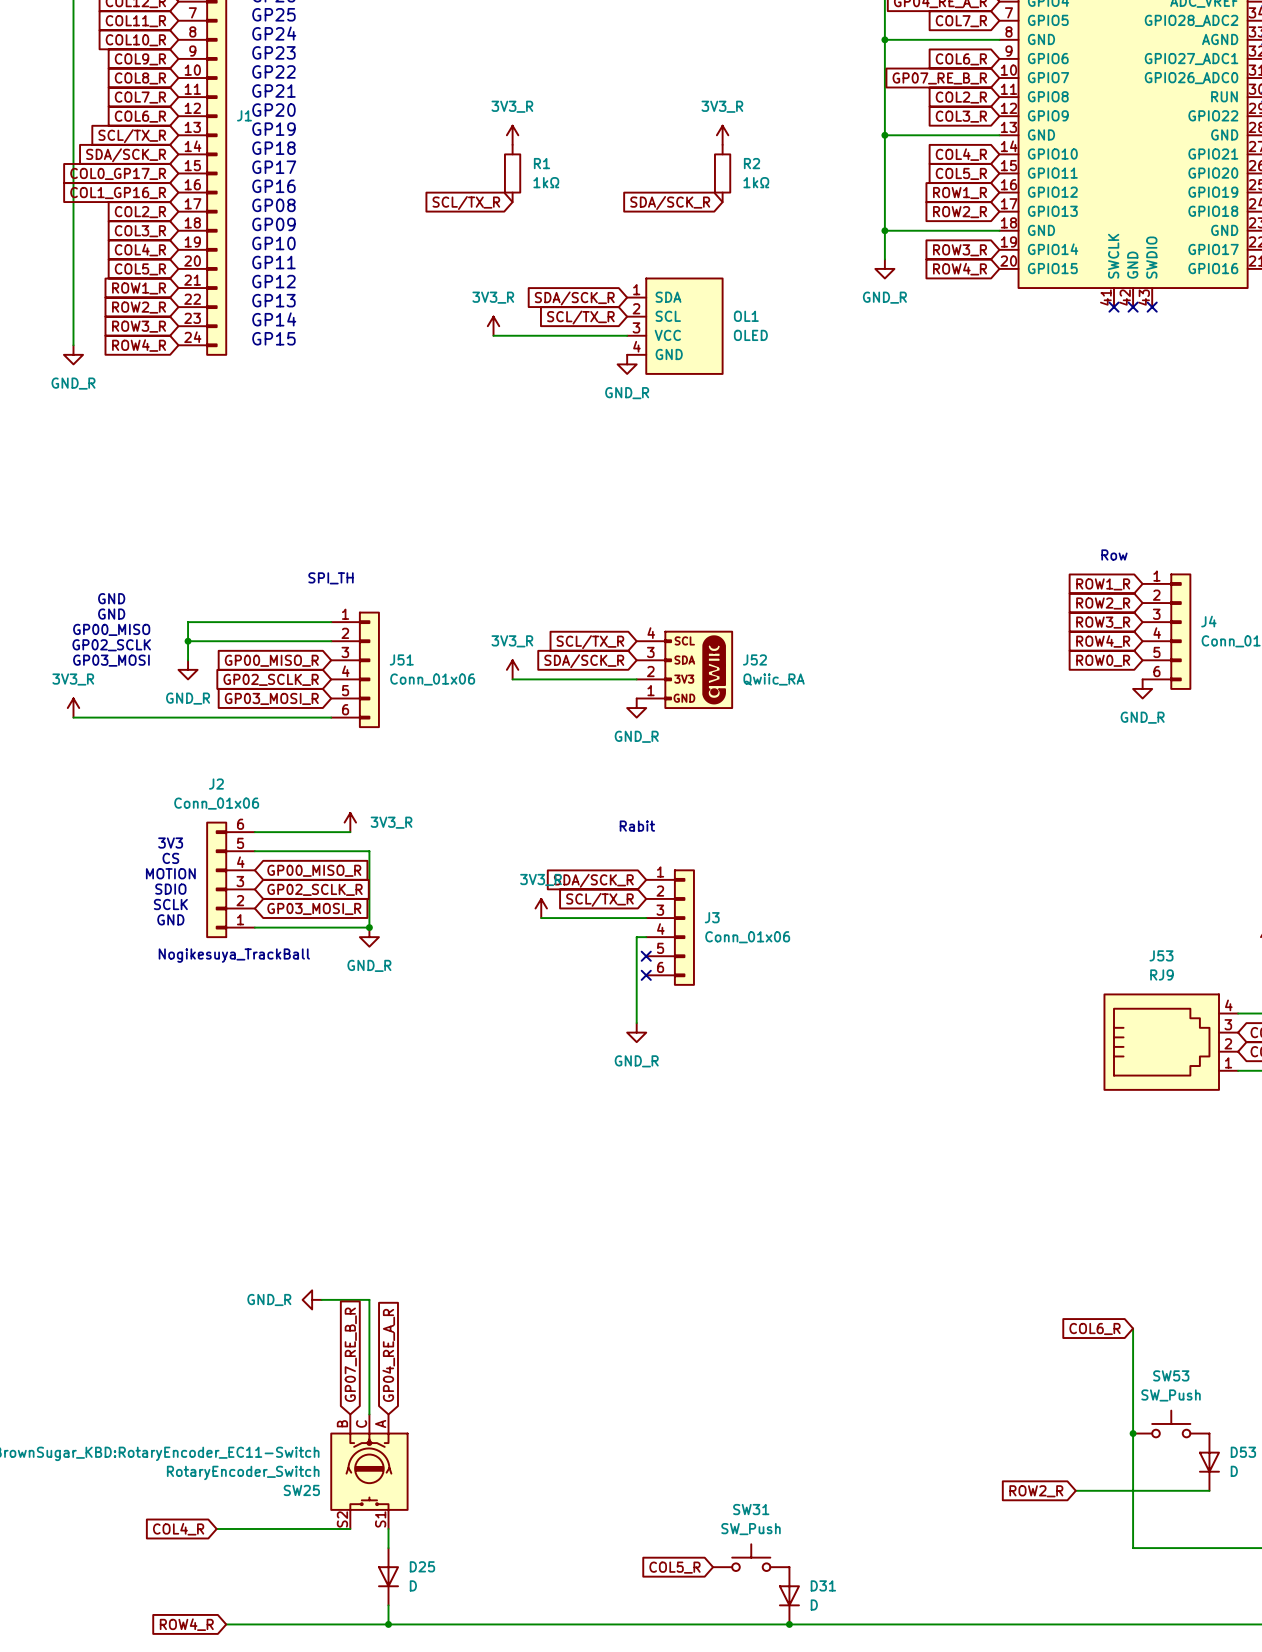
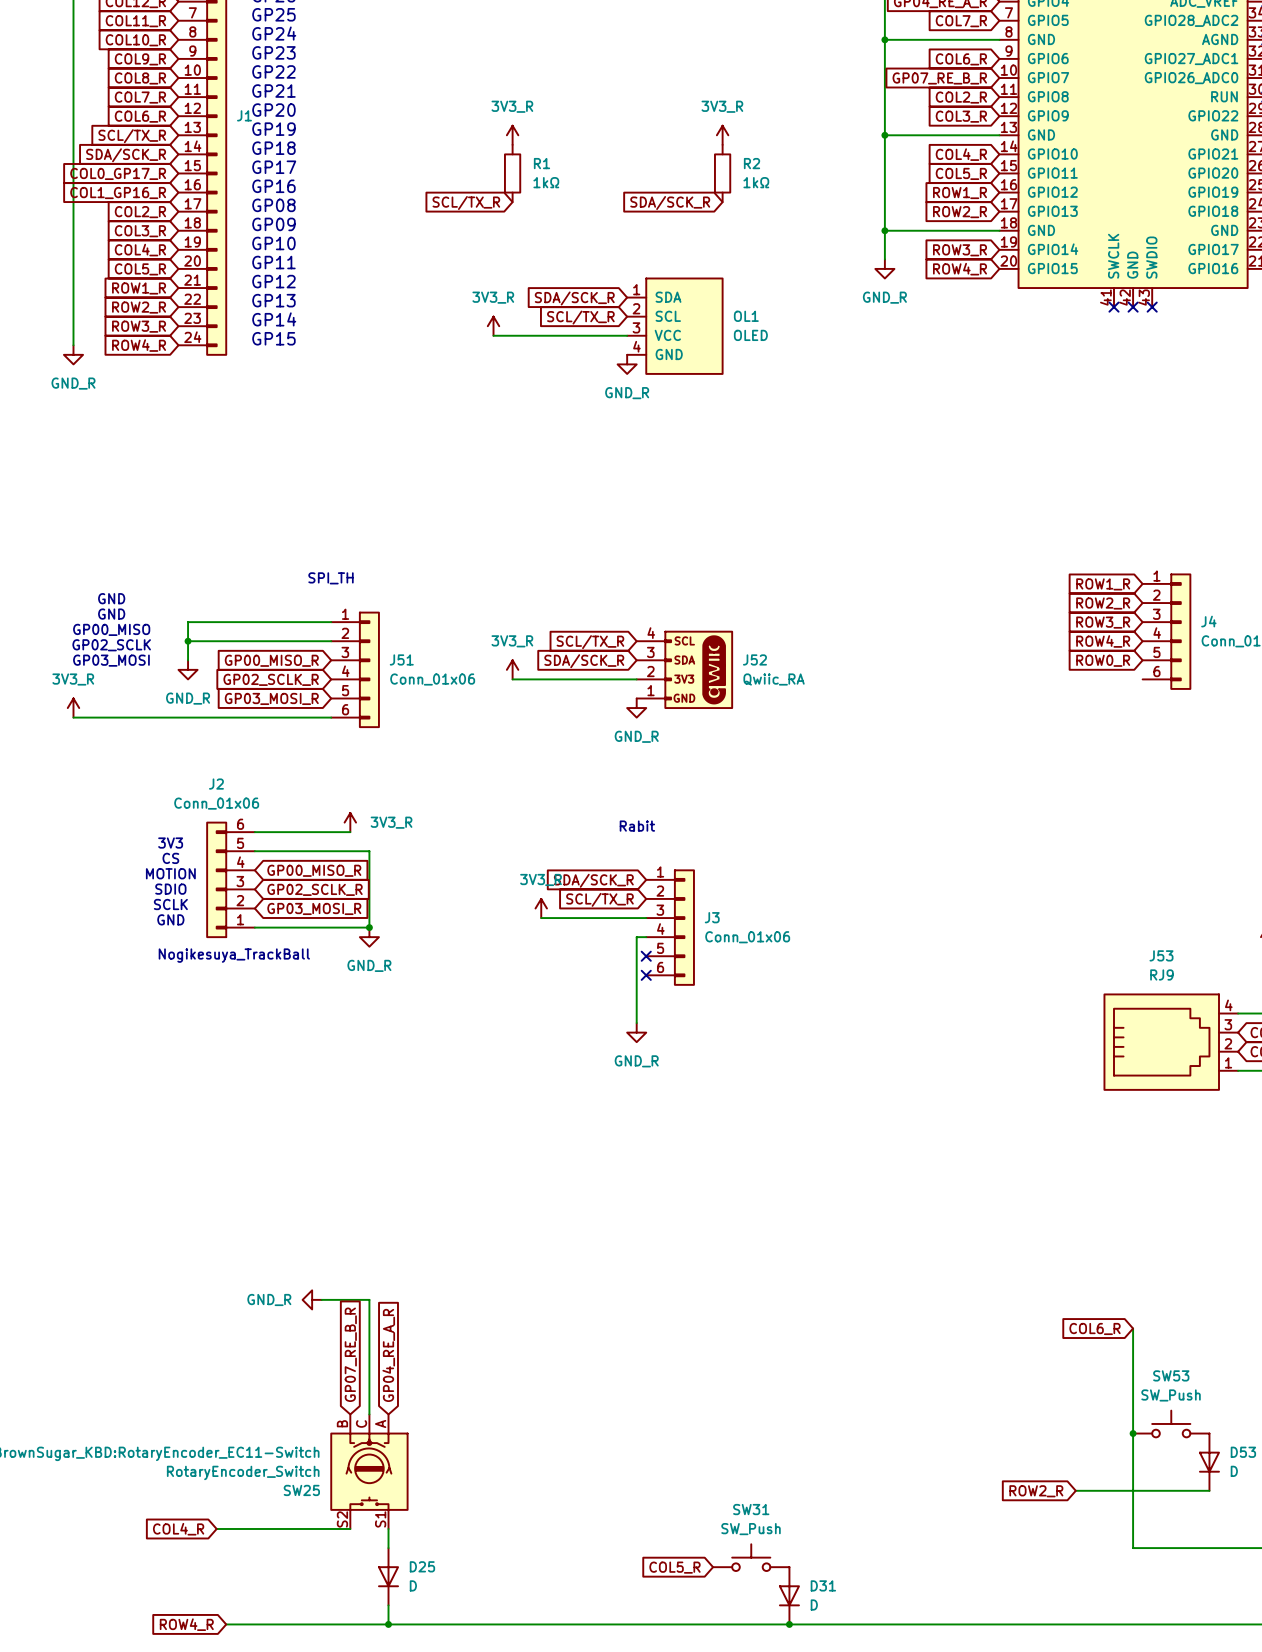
text: Row (1114, 554) -> none
power symbol: GND_R (1142, 688) -> none

